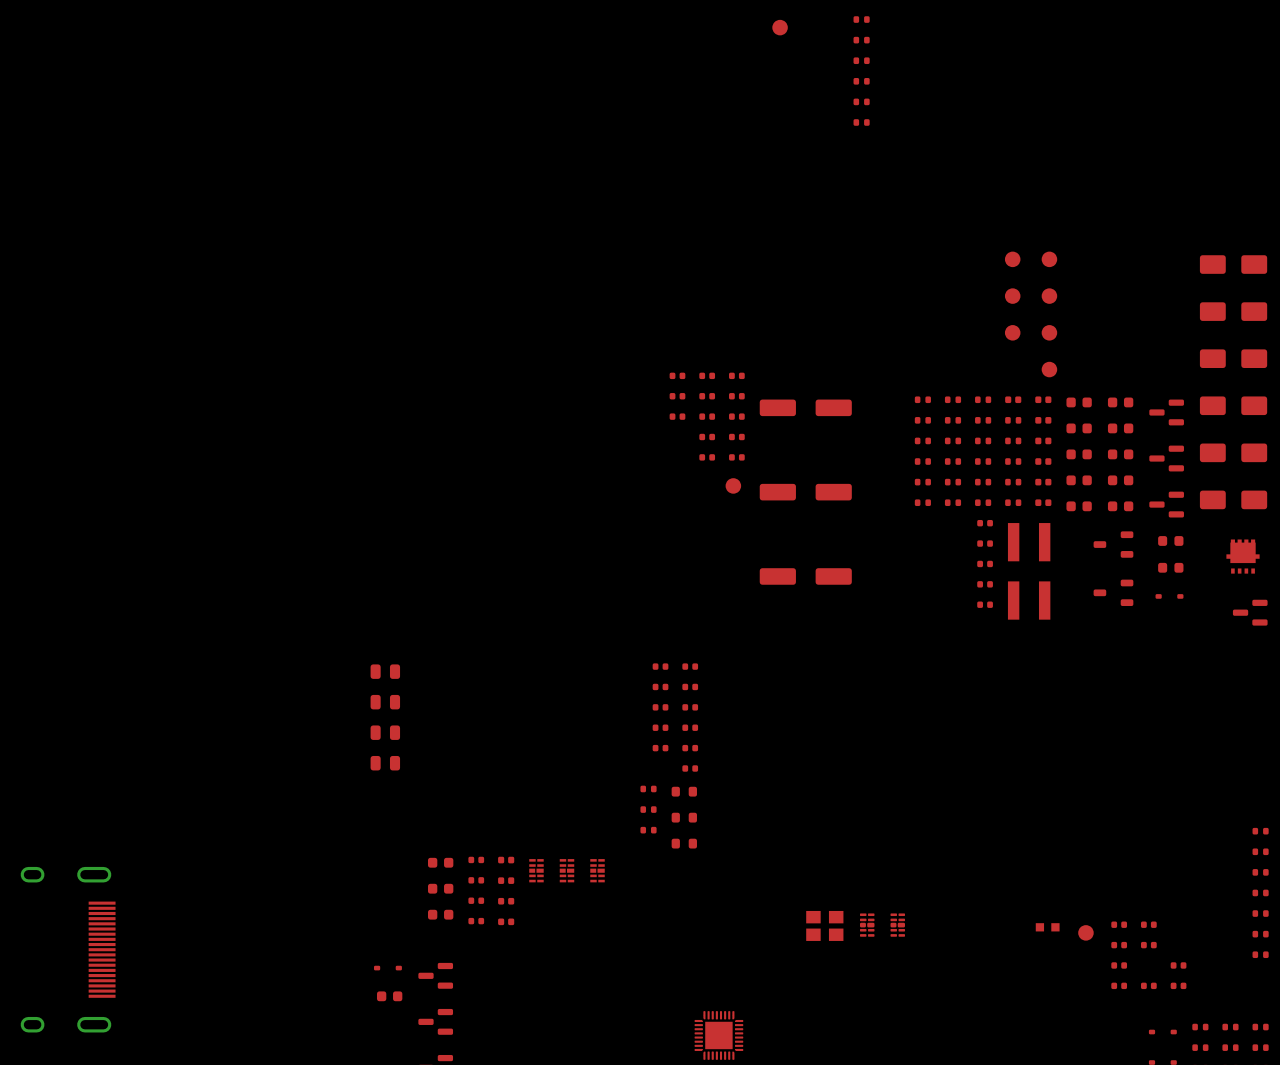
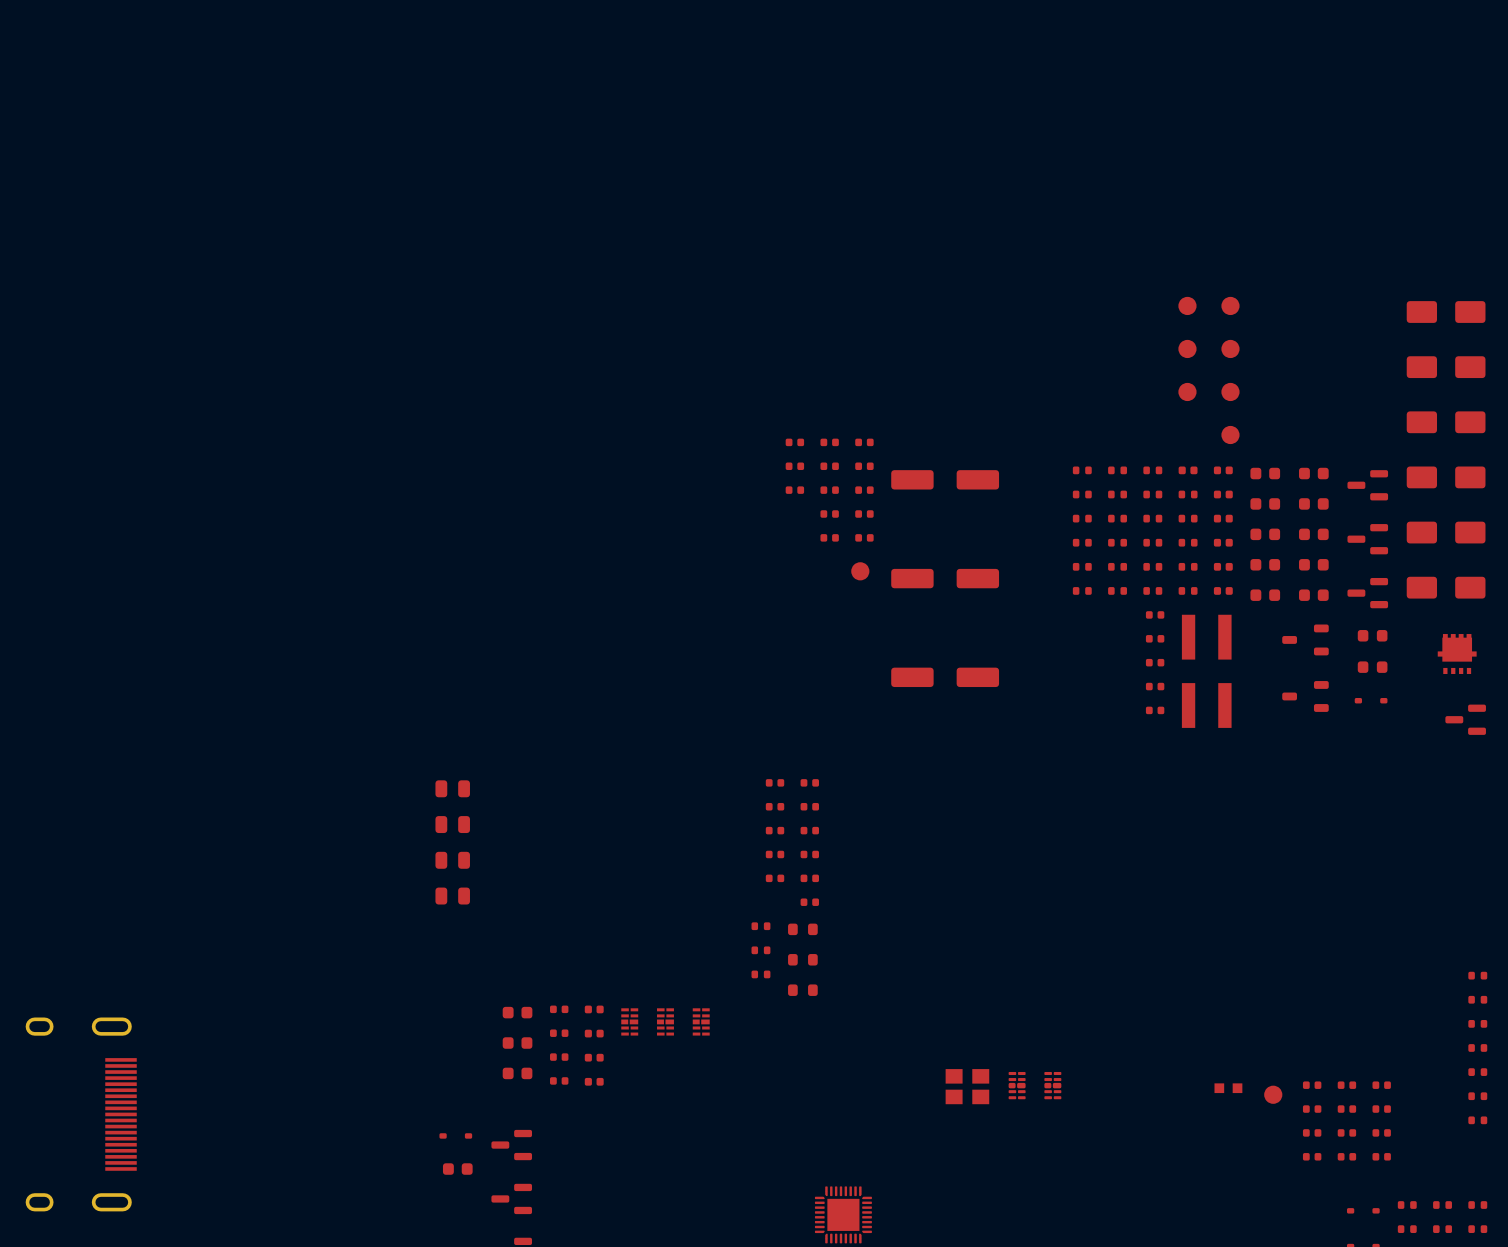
part: (861, 19) -> none
part: (780, 27) -> none
part: (861, 40) -> none
part: (861, 60) -> none
part: (861, 81) -> none
part: (861, 101) -> none
part: (861, 122) -> none
part: none -> (1381, 1085)
part: none -> (1381, 1109)
part: none -> (1346, 1132)

